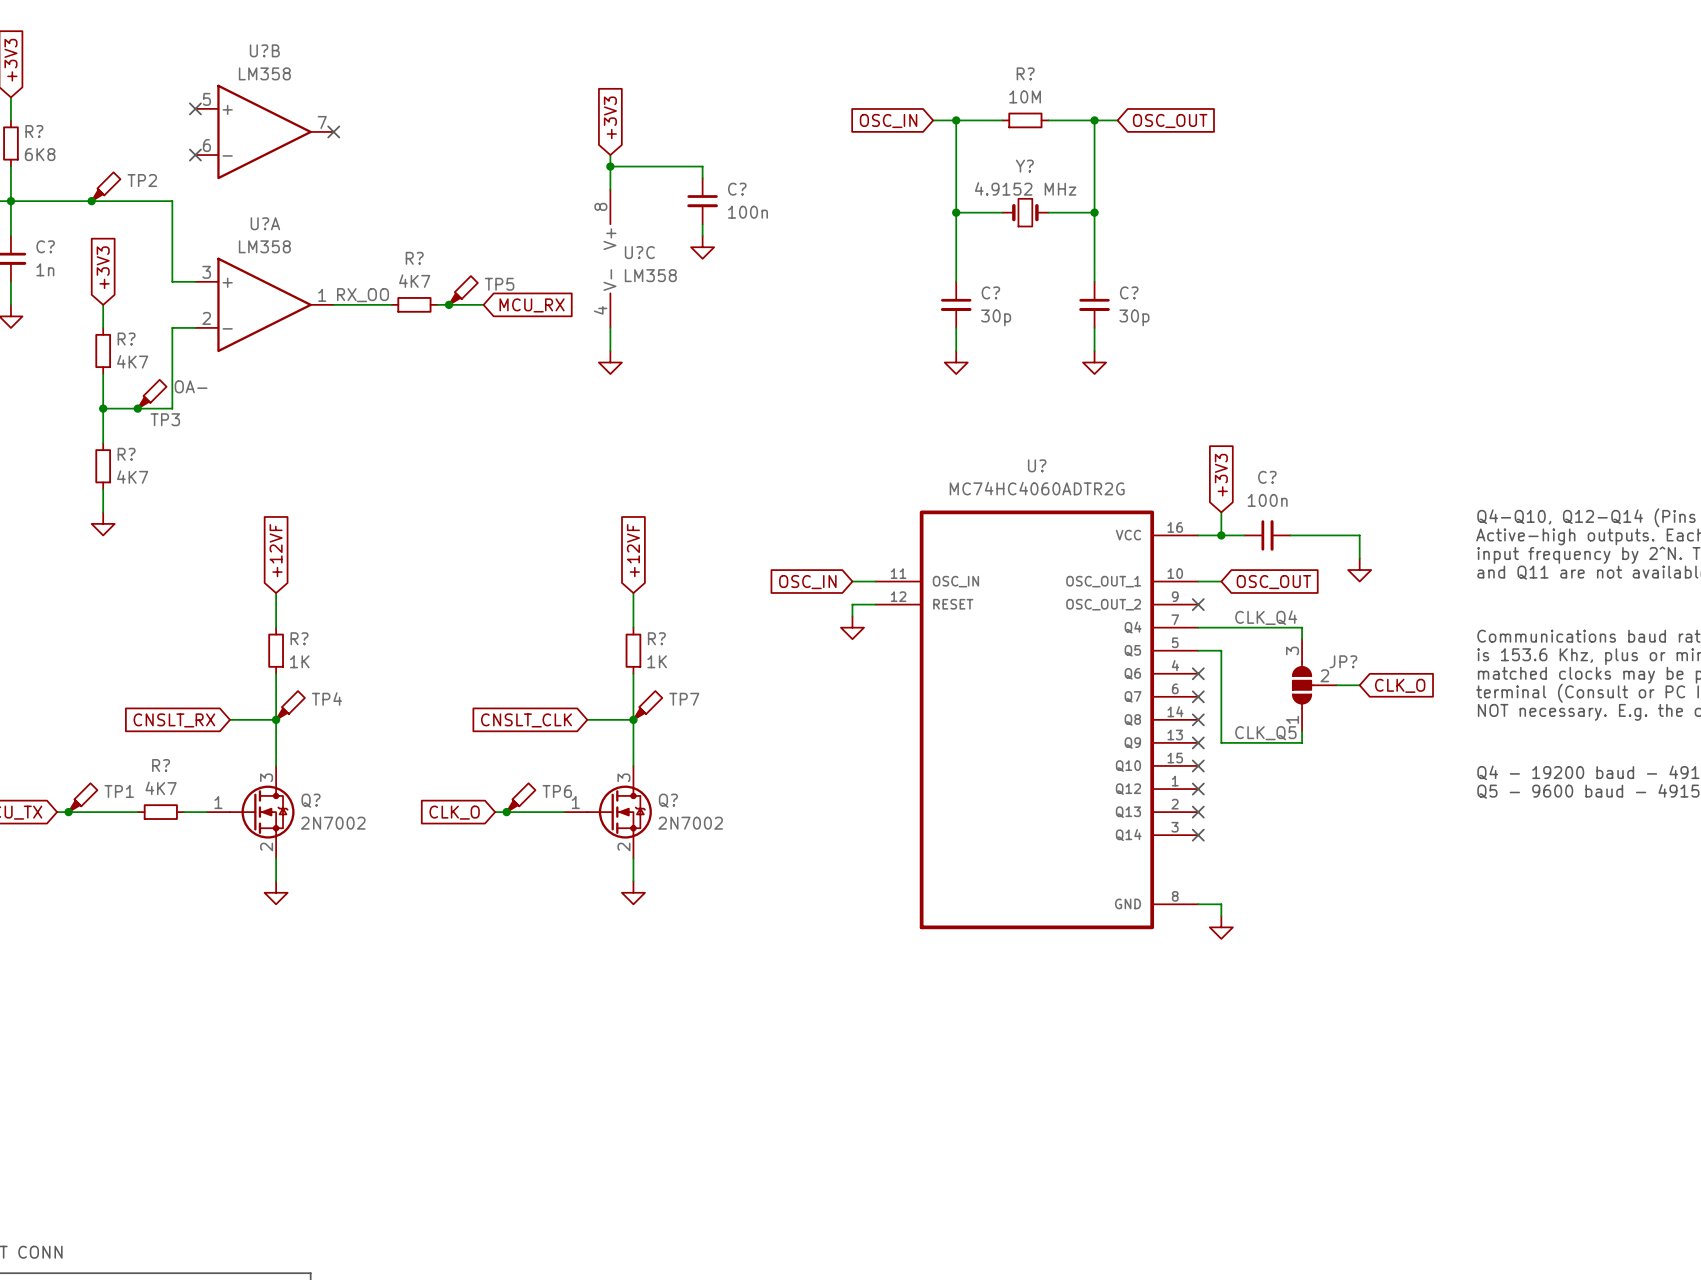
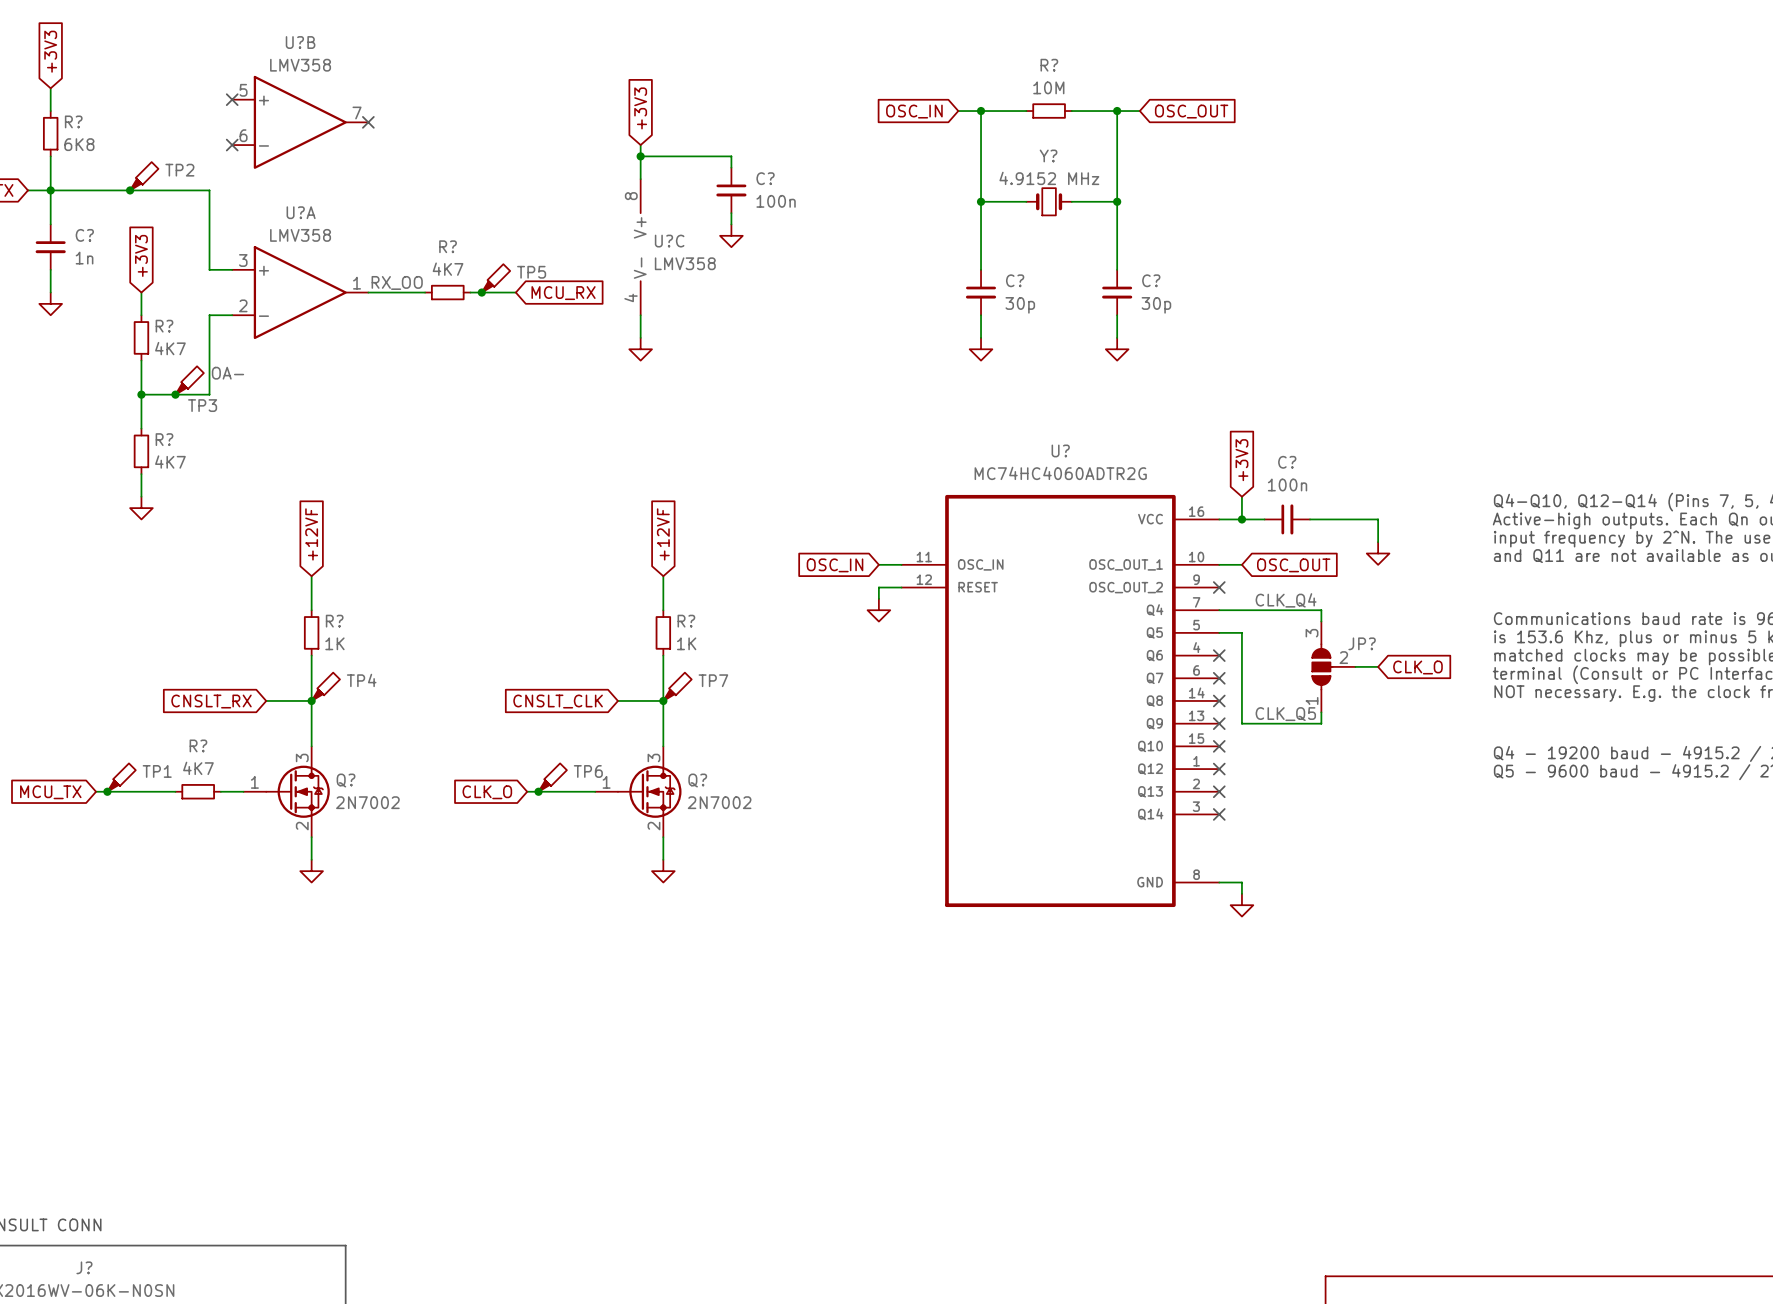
U?B value: LM358 (264, 73) -> LMV358 (300, 65)
U?A value: LM358 (264, 246) -> LMV358 (300, 235)
U?C value: LM358 (650, 275) -> LMV358 (685, 263)

